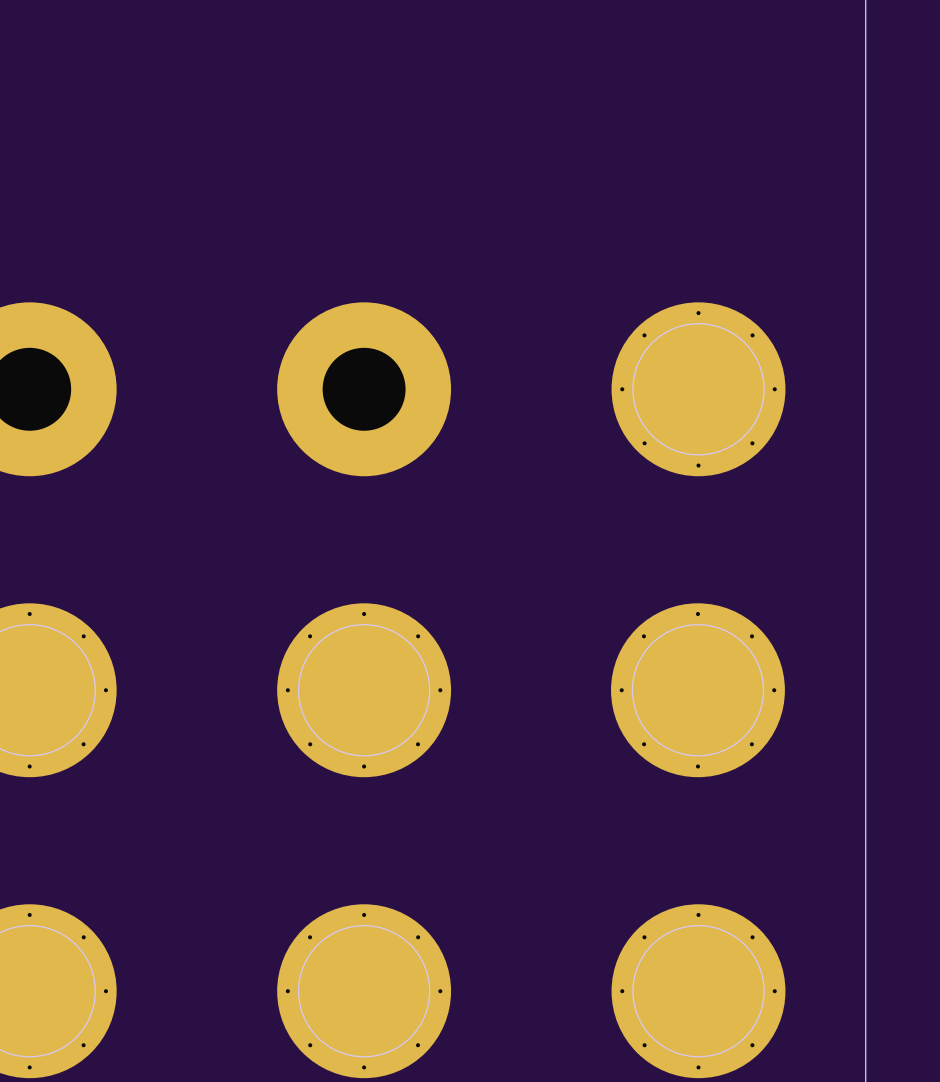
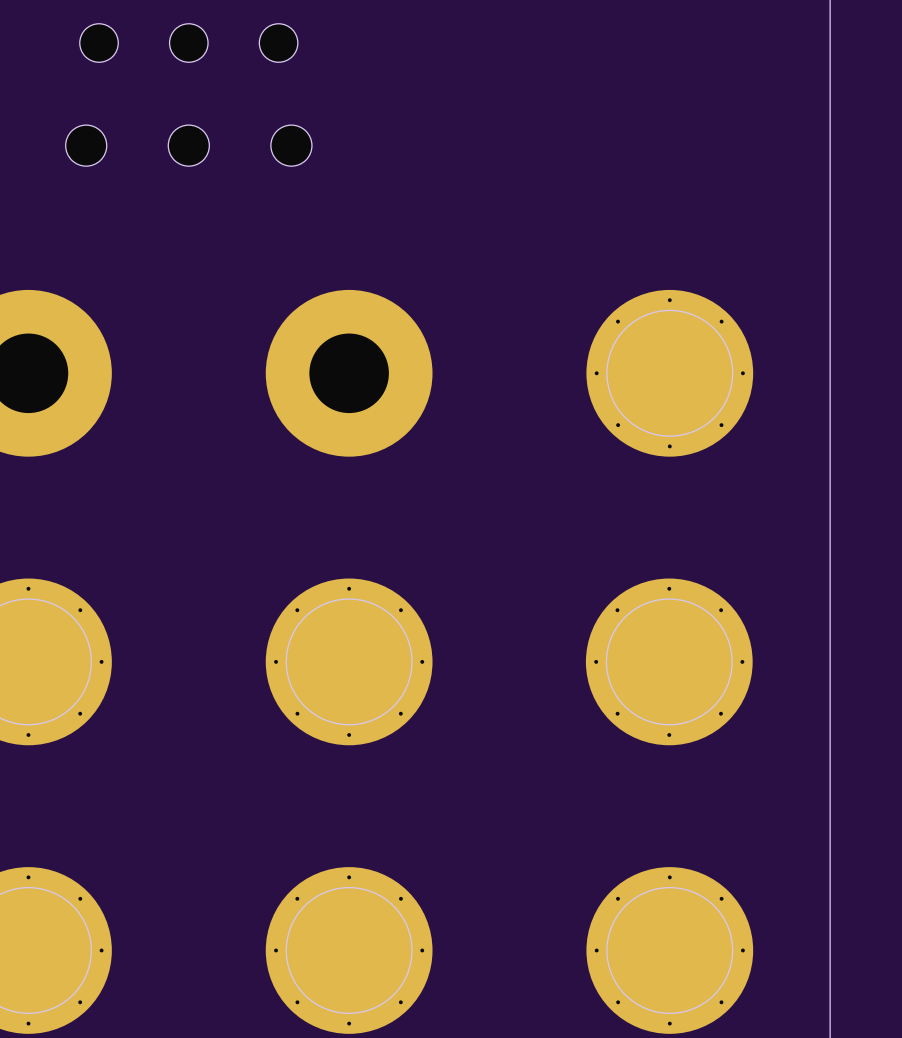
part: none -> (99, 43)
part: none -> (188, 43)
part: none -> (278, 43)
part: none -> (86, 145)
part: none -> (188, 145)
part: none -> (291, 145)

